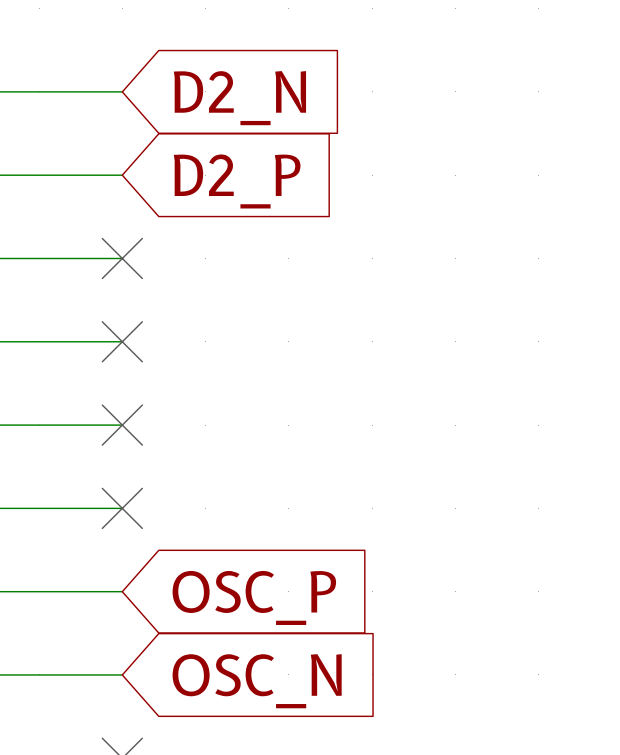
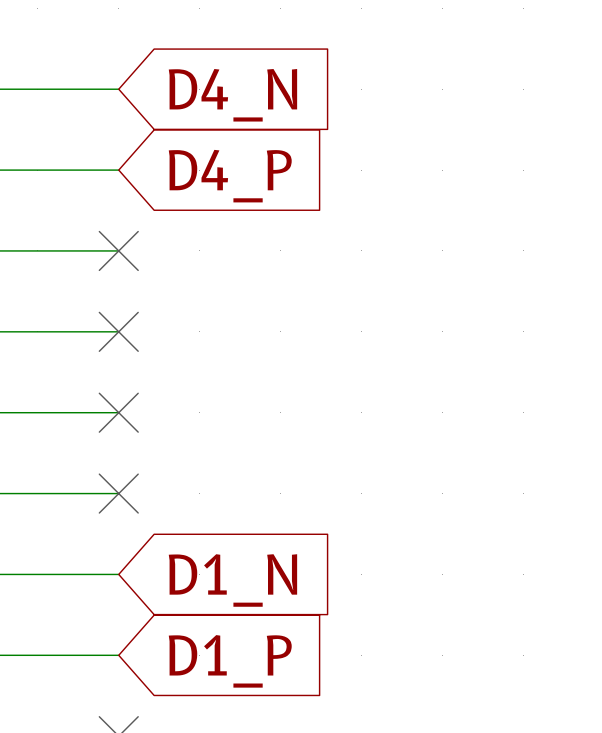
global label: D2_N (239, 98) -> D4_N (232, 95)
global label: D2_P (237, 181) -> D4_P (230, 176)
global label: OSC_P (254, 597) -> D1_N (232, 580)
global label: OSC_N (257, 681) -> D1_P (230, 661)

